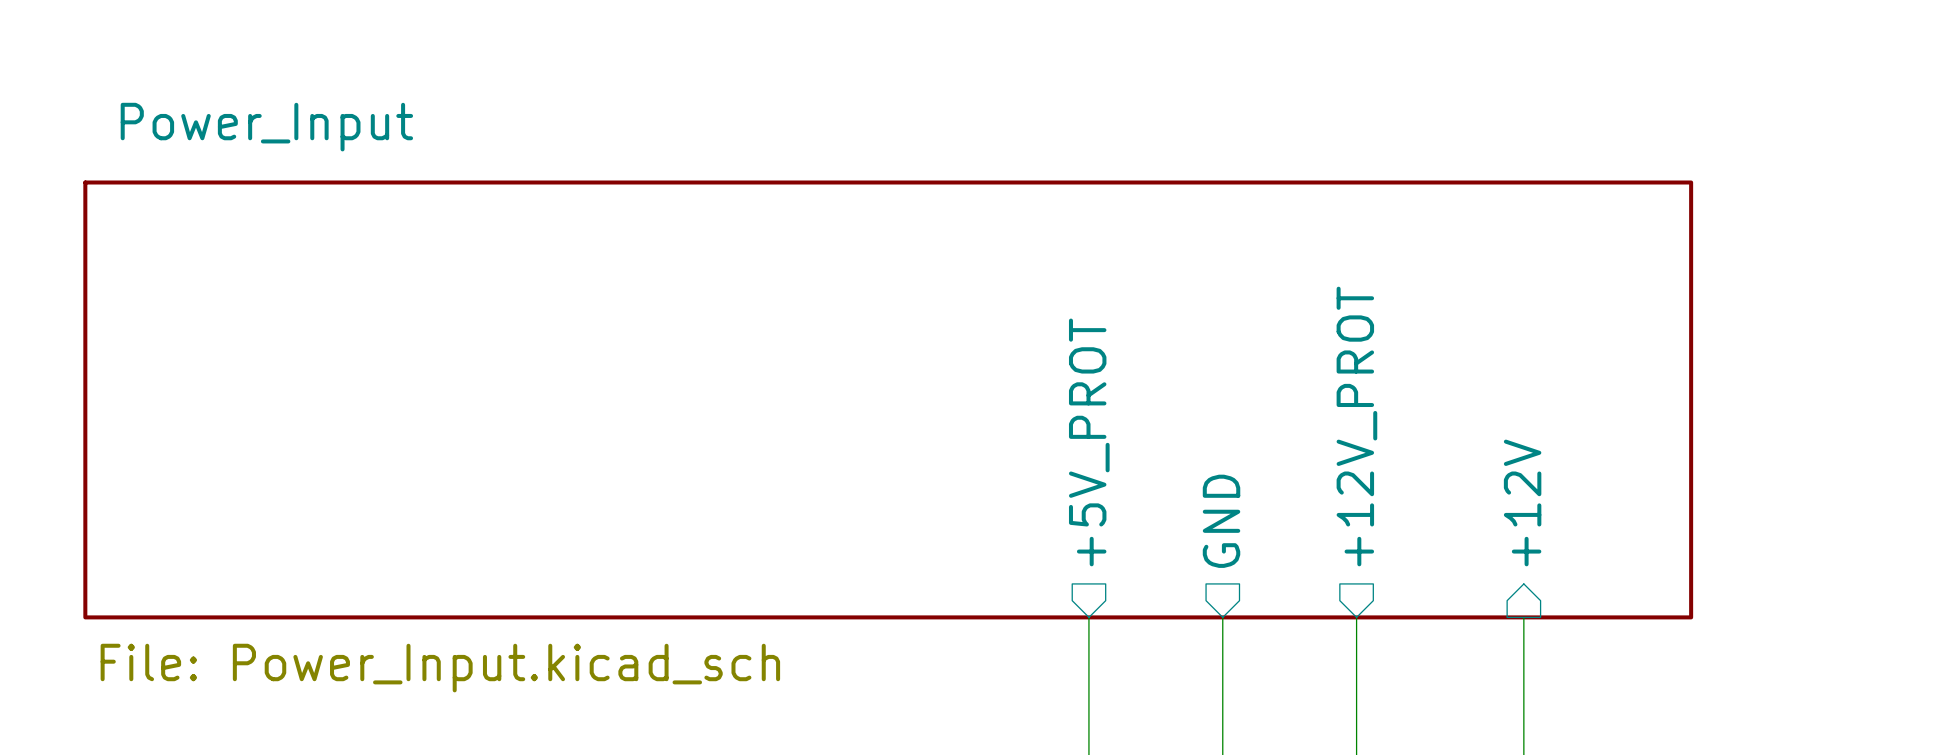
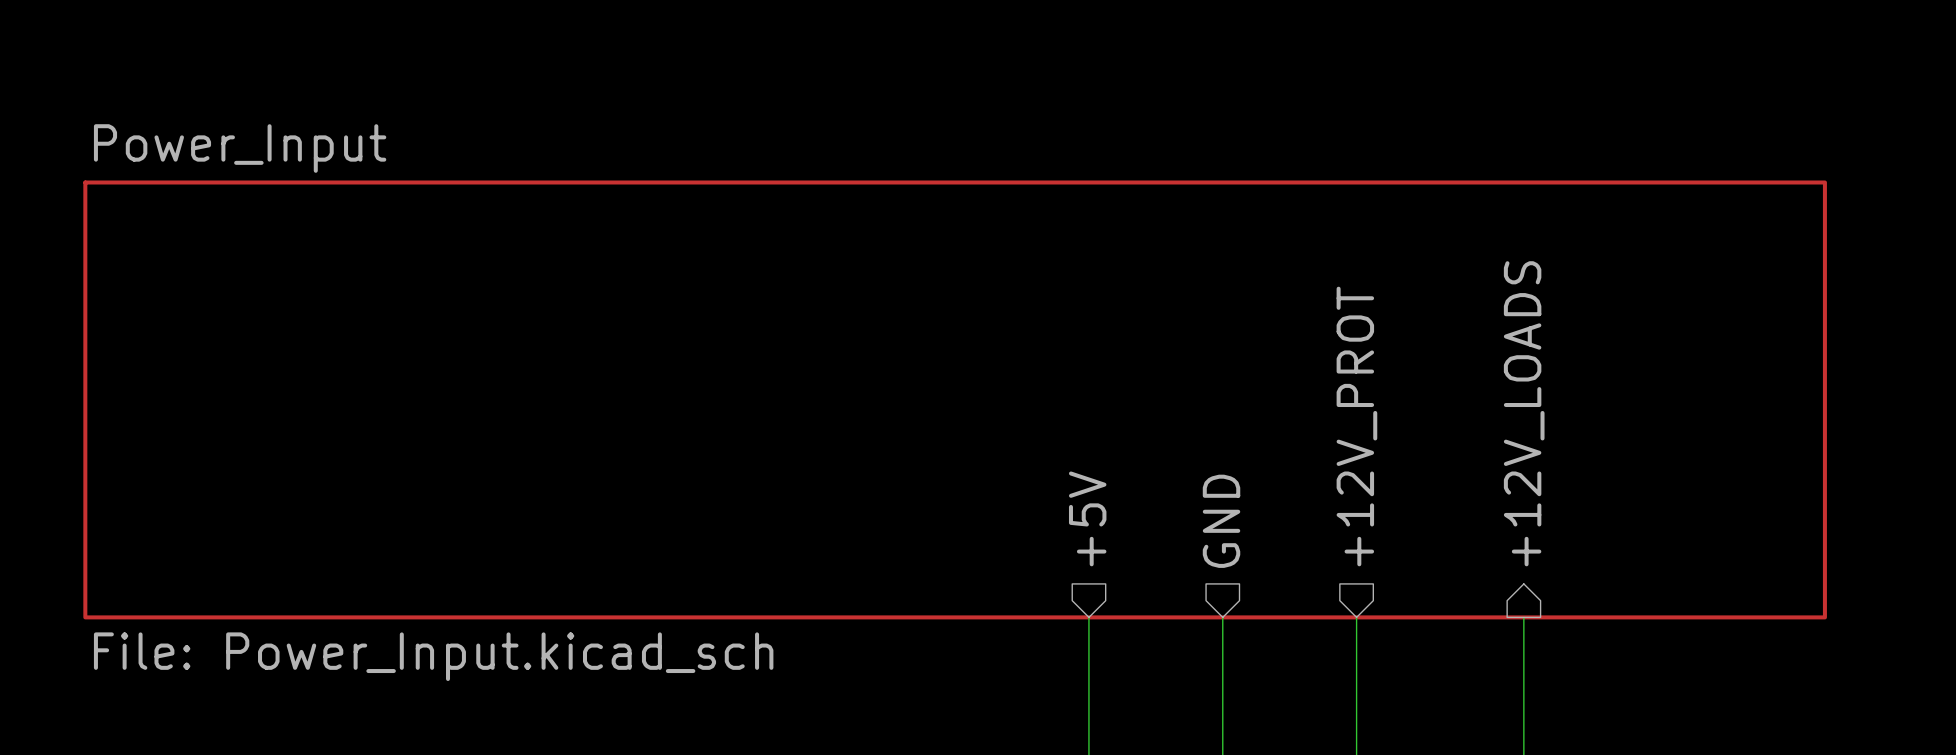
sheet Power_Input: File: Power_Input.kicad_sch (888, 399) -> none
sheet Power_Input: none -> File: Power_Input.kicad_sch (955, 399)
sheet pin: +5V_PROT (1089, 442) -> +5V (1087, 518)
sheet pin: +12V (1522, 502) -> +12V_LOADS (1524, 413)

